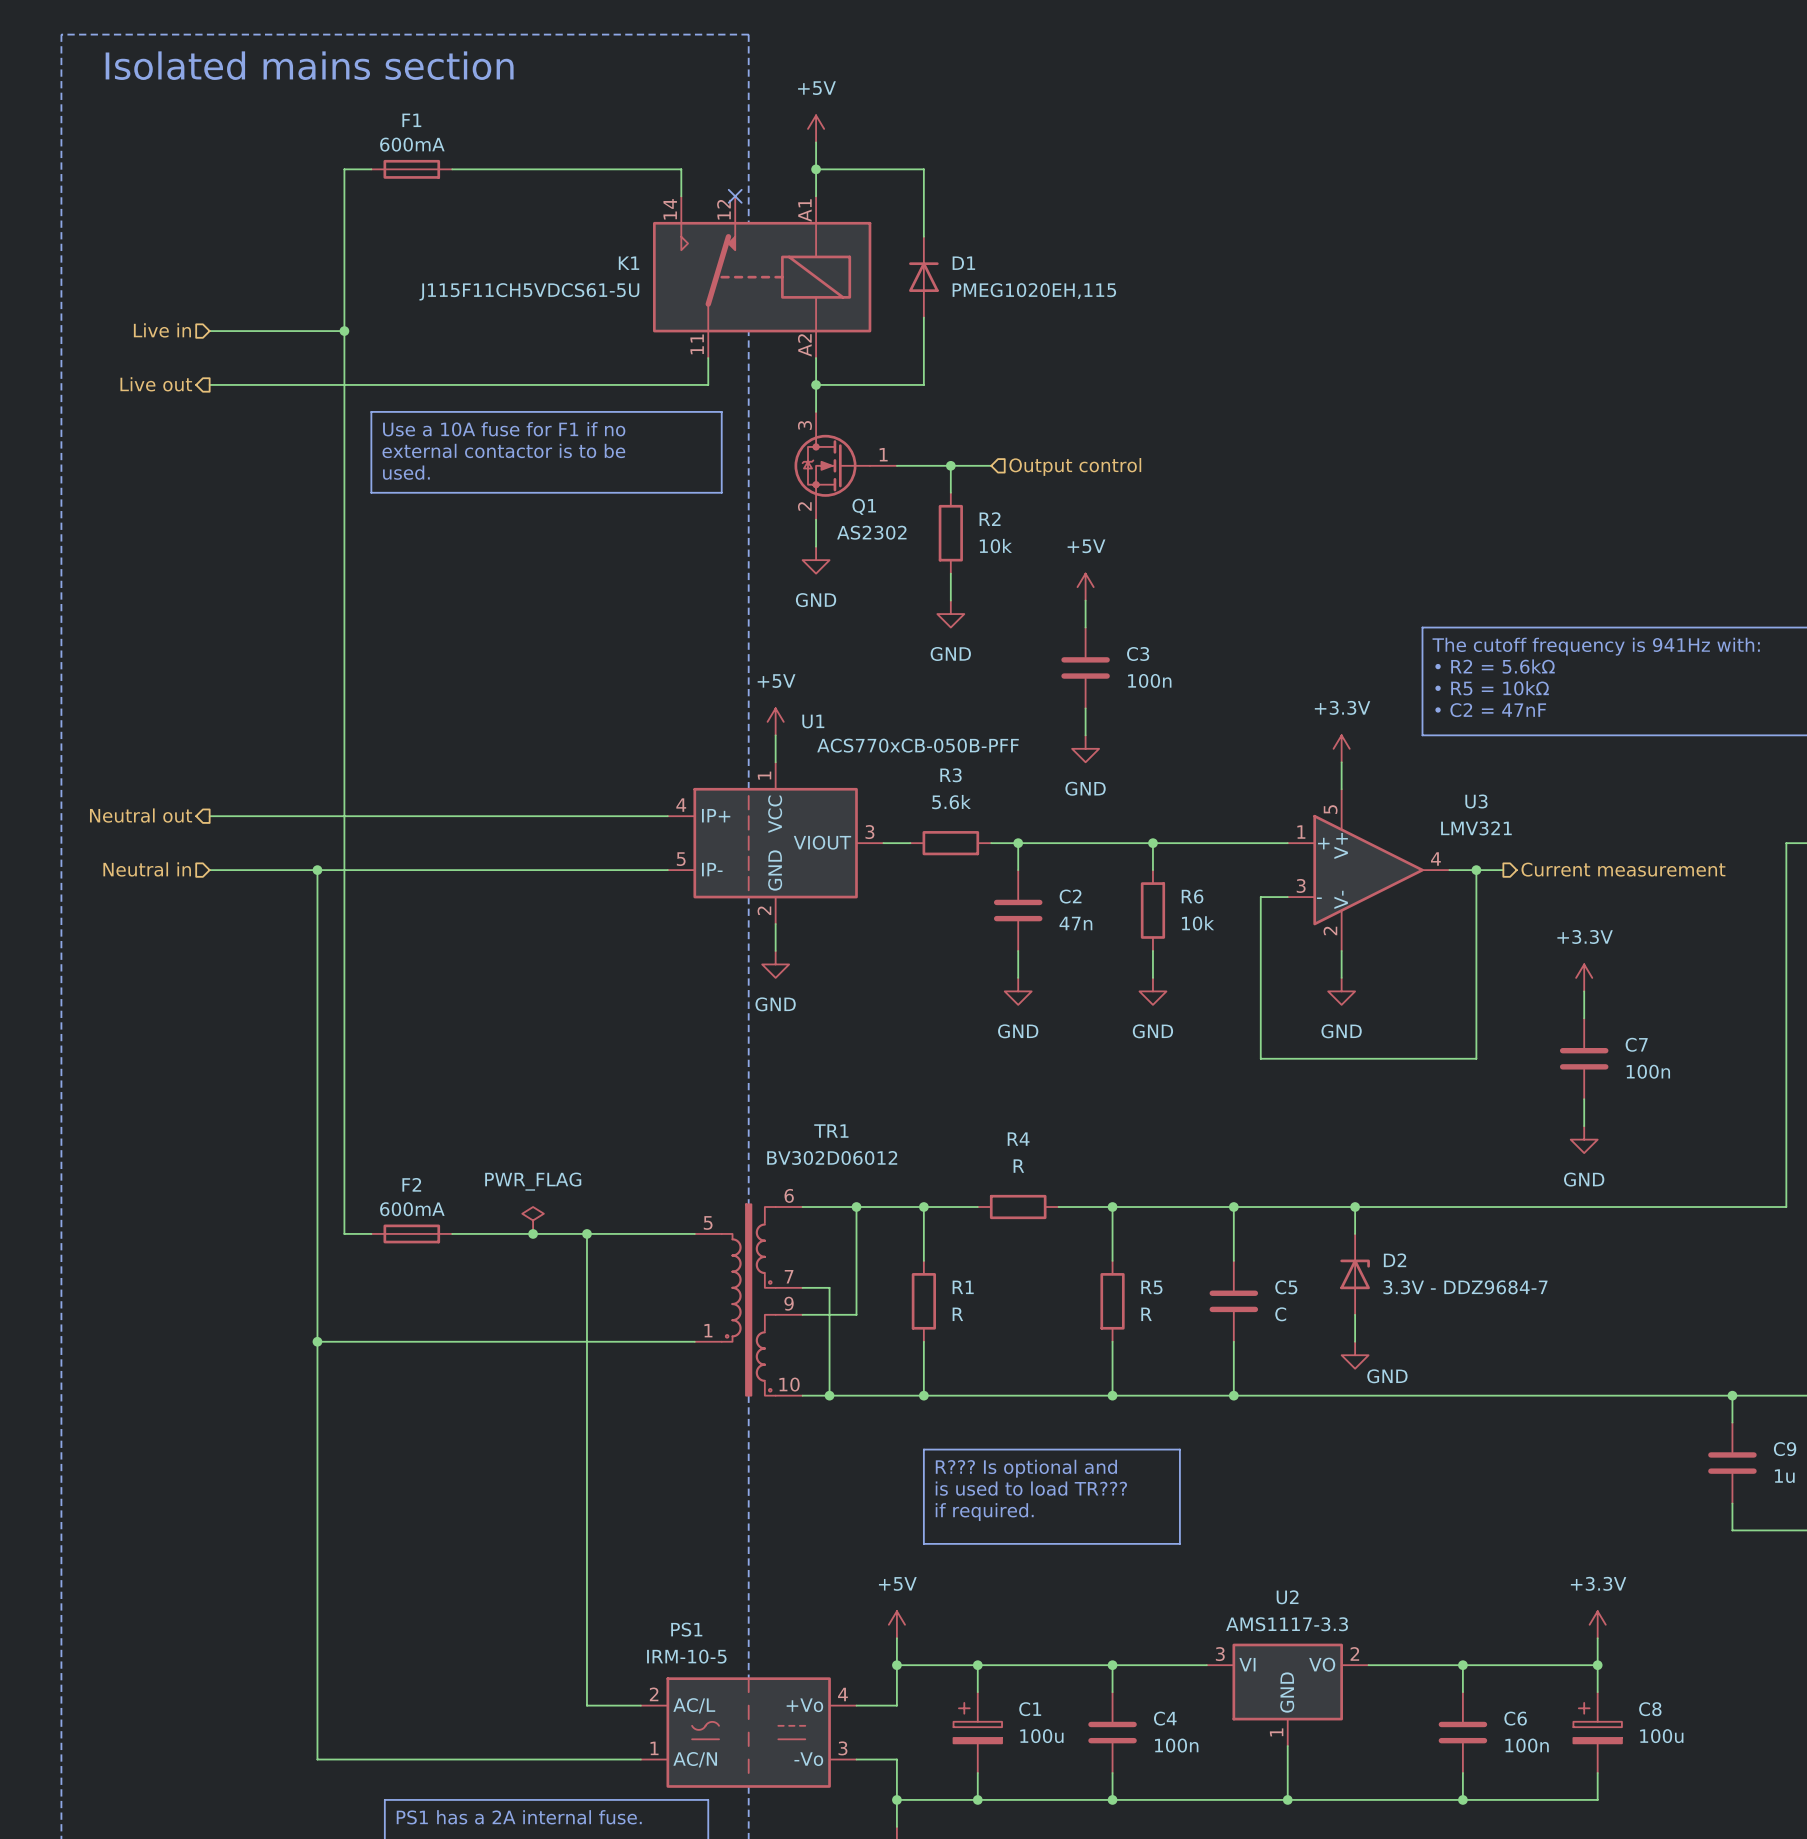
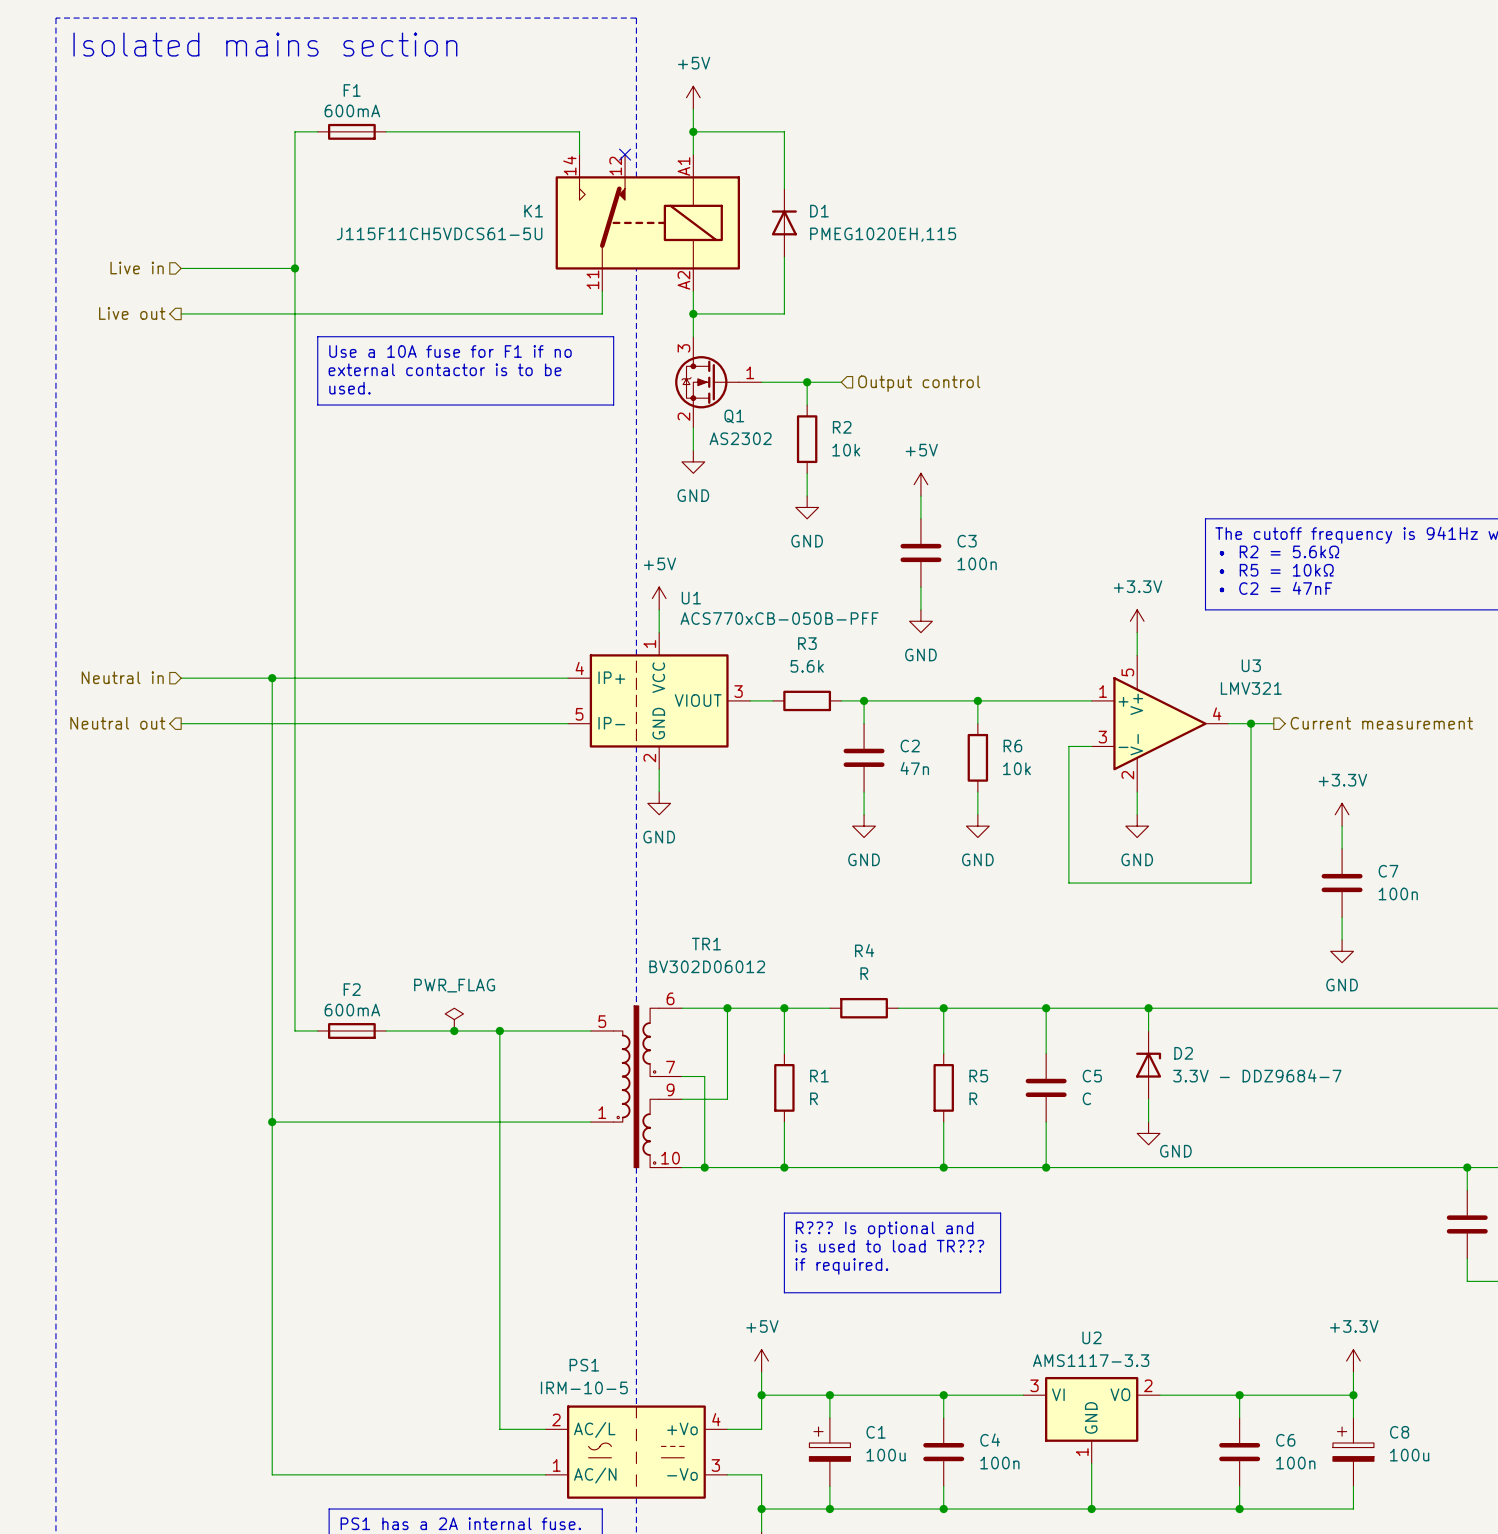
hierarchical label shape: output (141, 815) -> input (122, 677)
hierarchical label: Neutral out (141, 815) -> Neutral in (122, 677)
wire: none -> (272, 678) (272, 723)
hierarchical label shape: input (147, 869) -> output (117, 723)
hierarchical label: Neutral in (147, 869) -> Neutral out (117, 723)
junction position: (317, 870) -> (272, 678)

